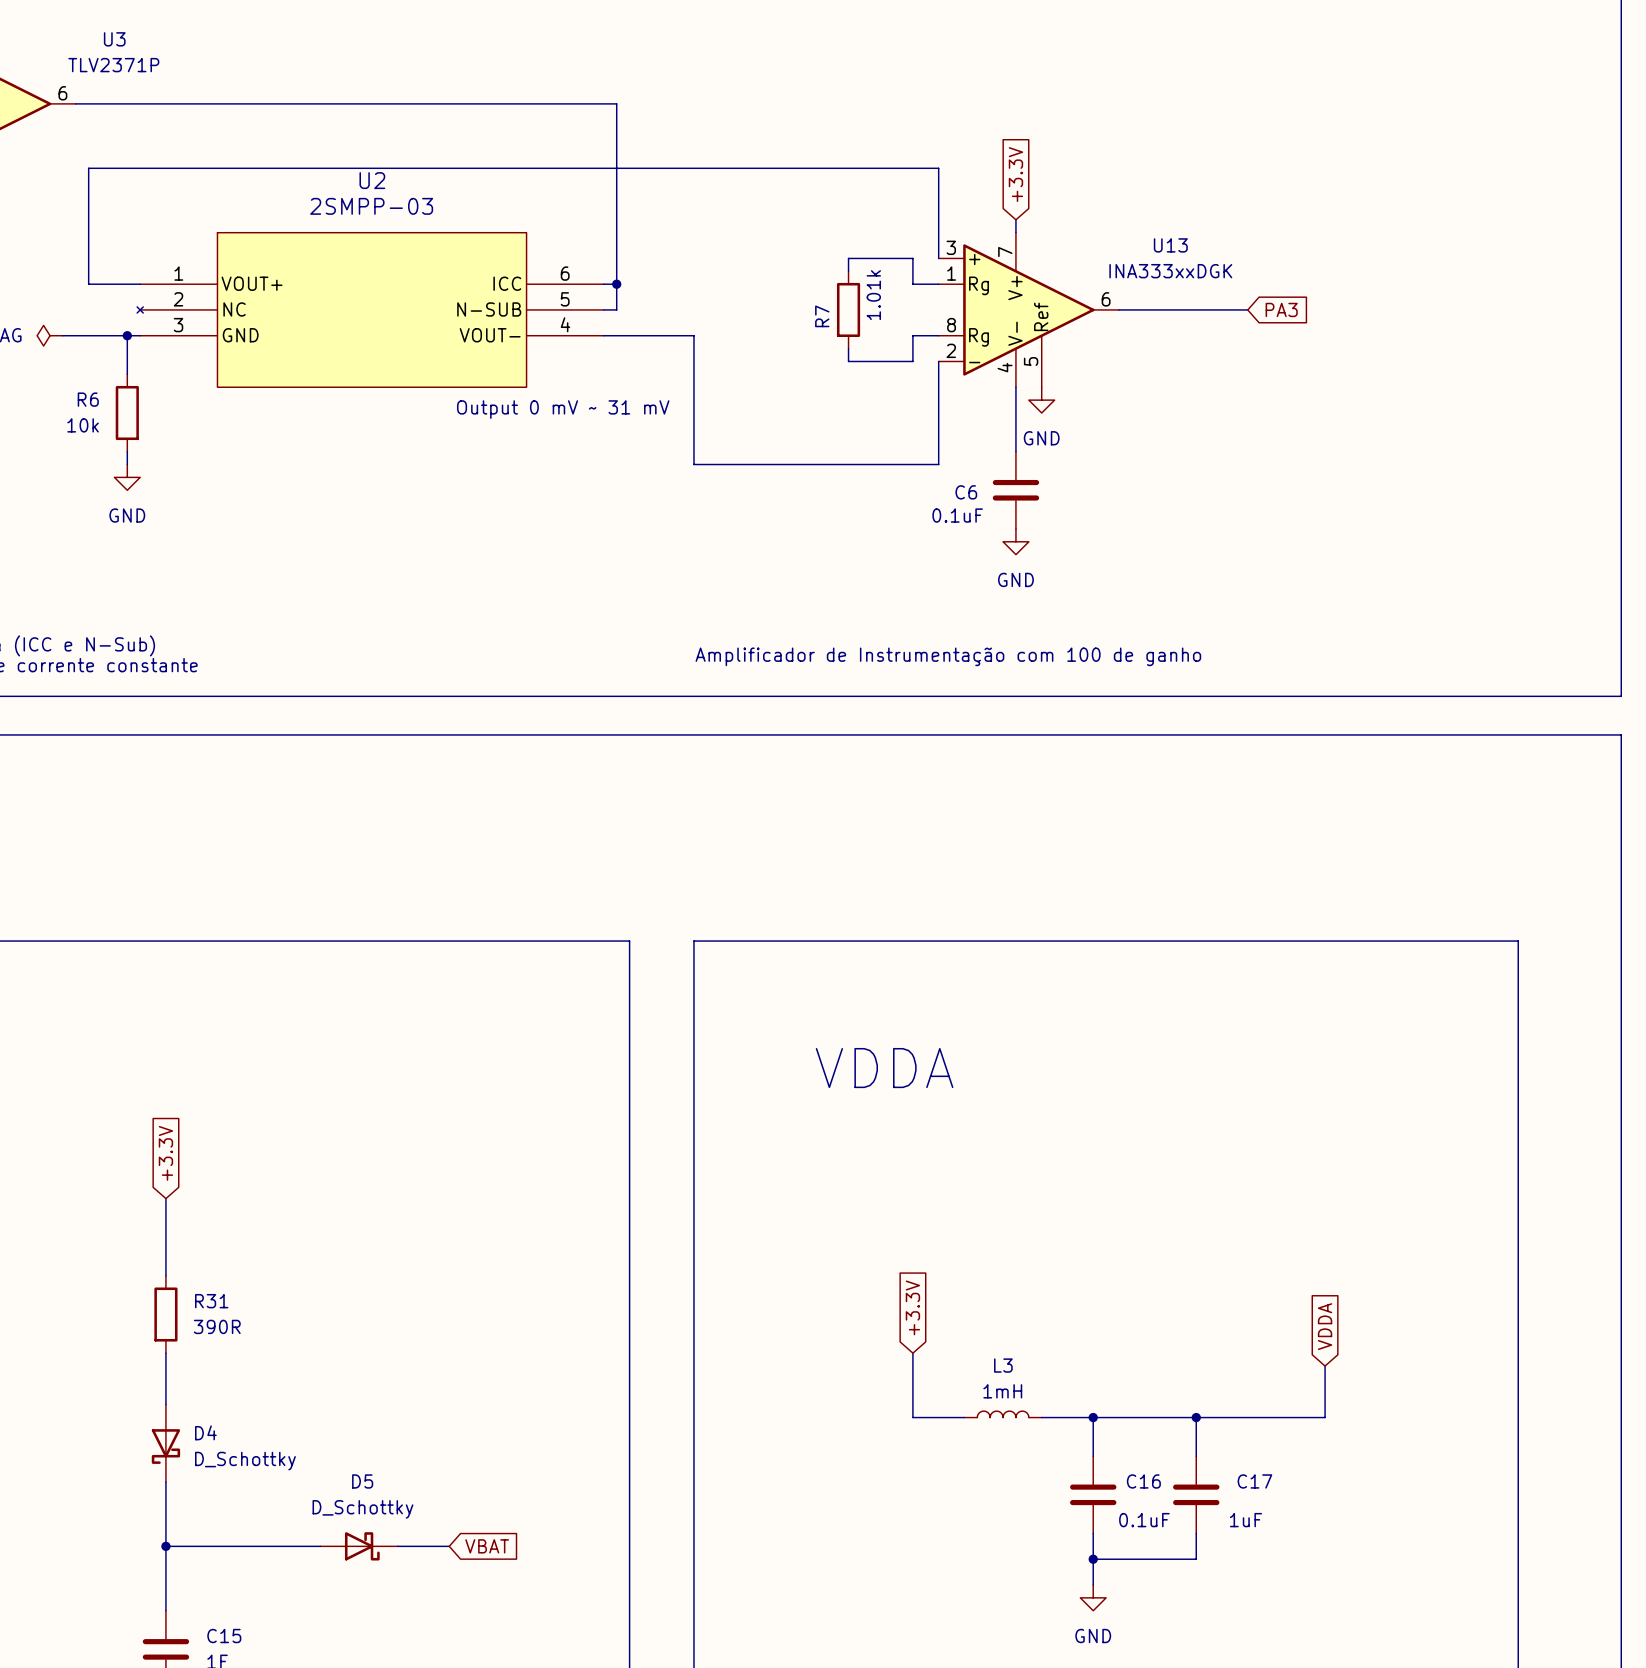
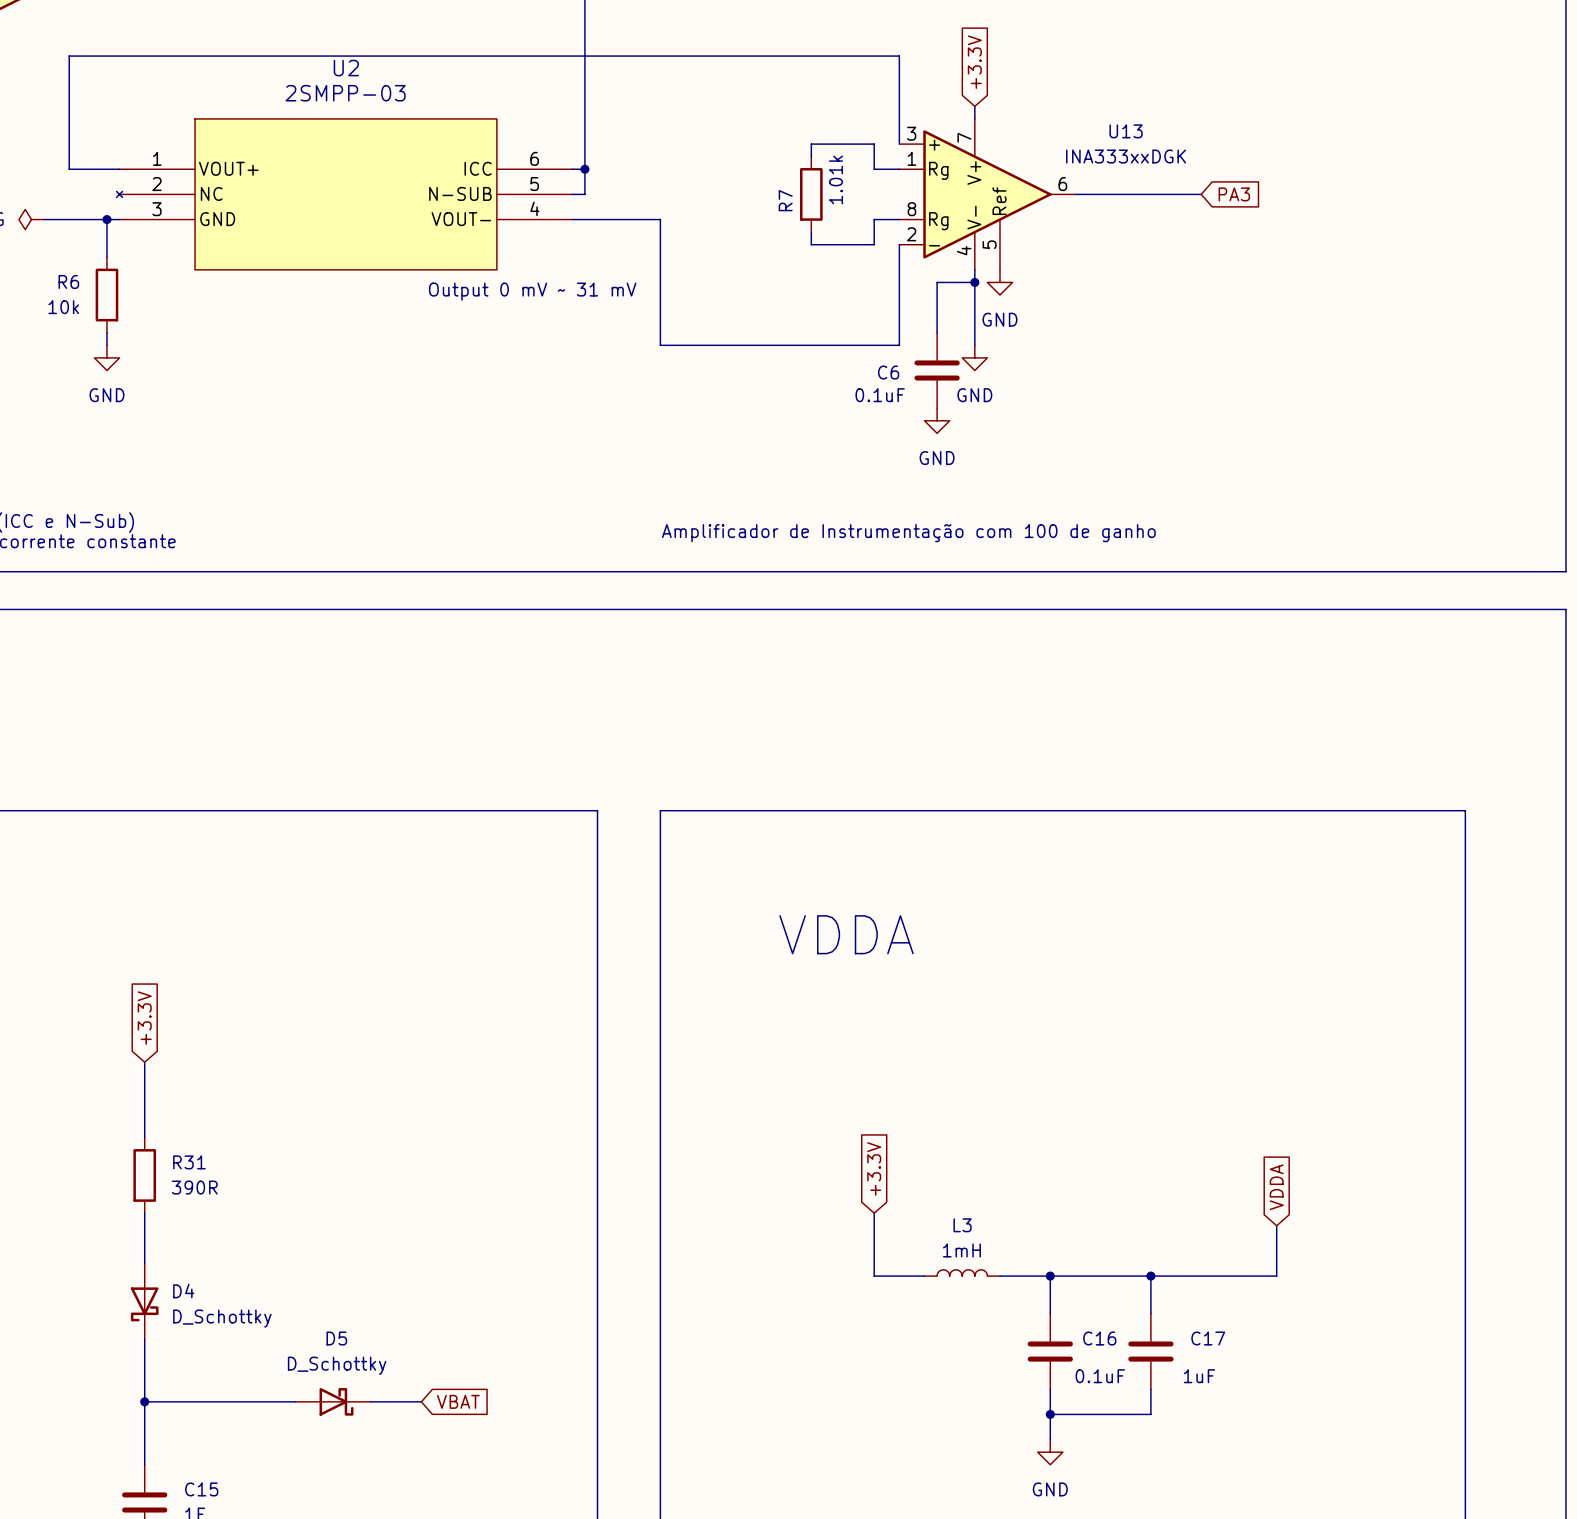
wire: none -> (974, 282) (937, 282) (937, 332)
junction: none -> (974, 282)
power symbol: none -> GND (974, 357)
C6 position: (1015, 490) -> (937, 370)
power symbol: none -> GND (937, 420)
power symbol: GND (1015, 541) -> none

